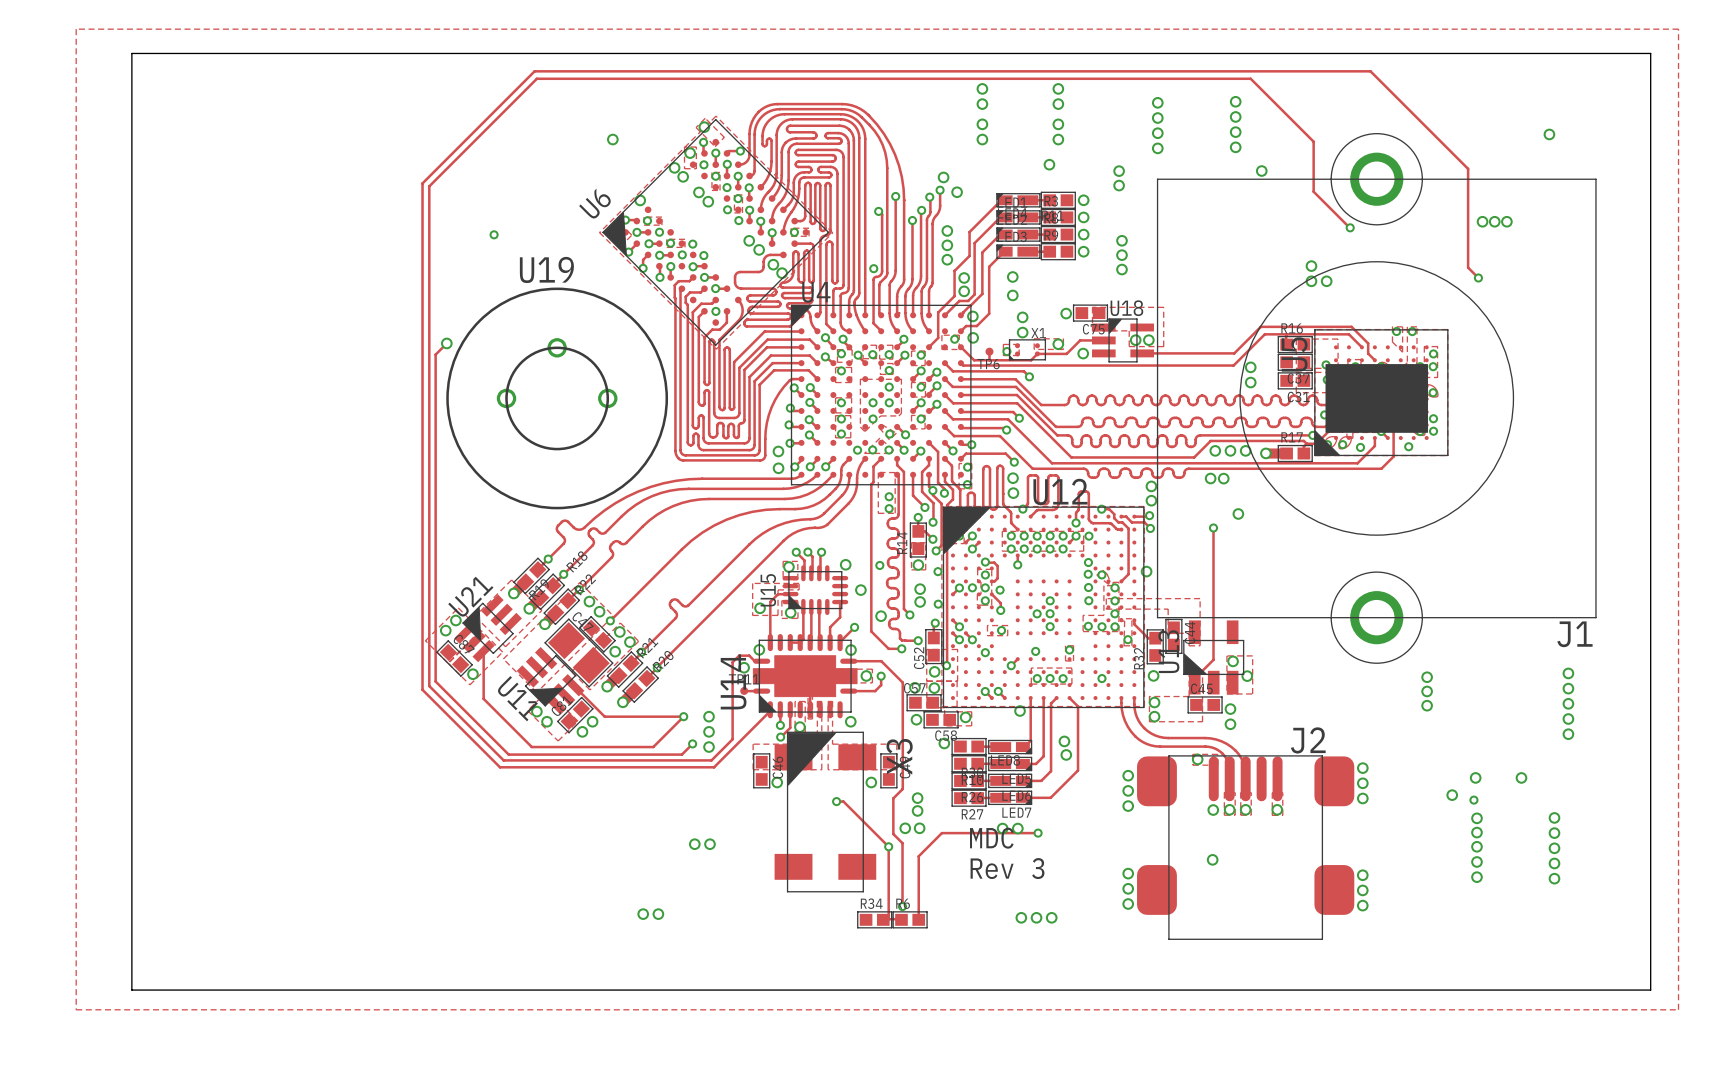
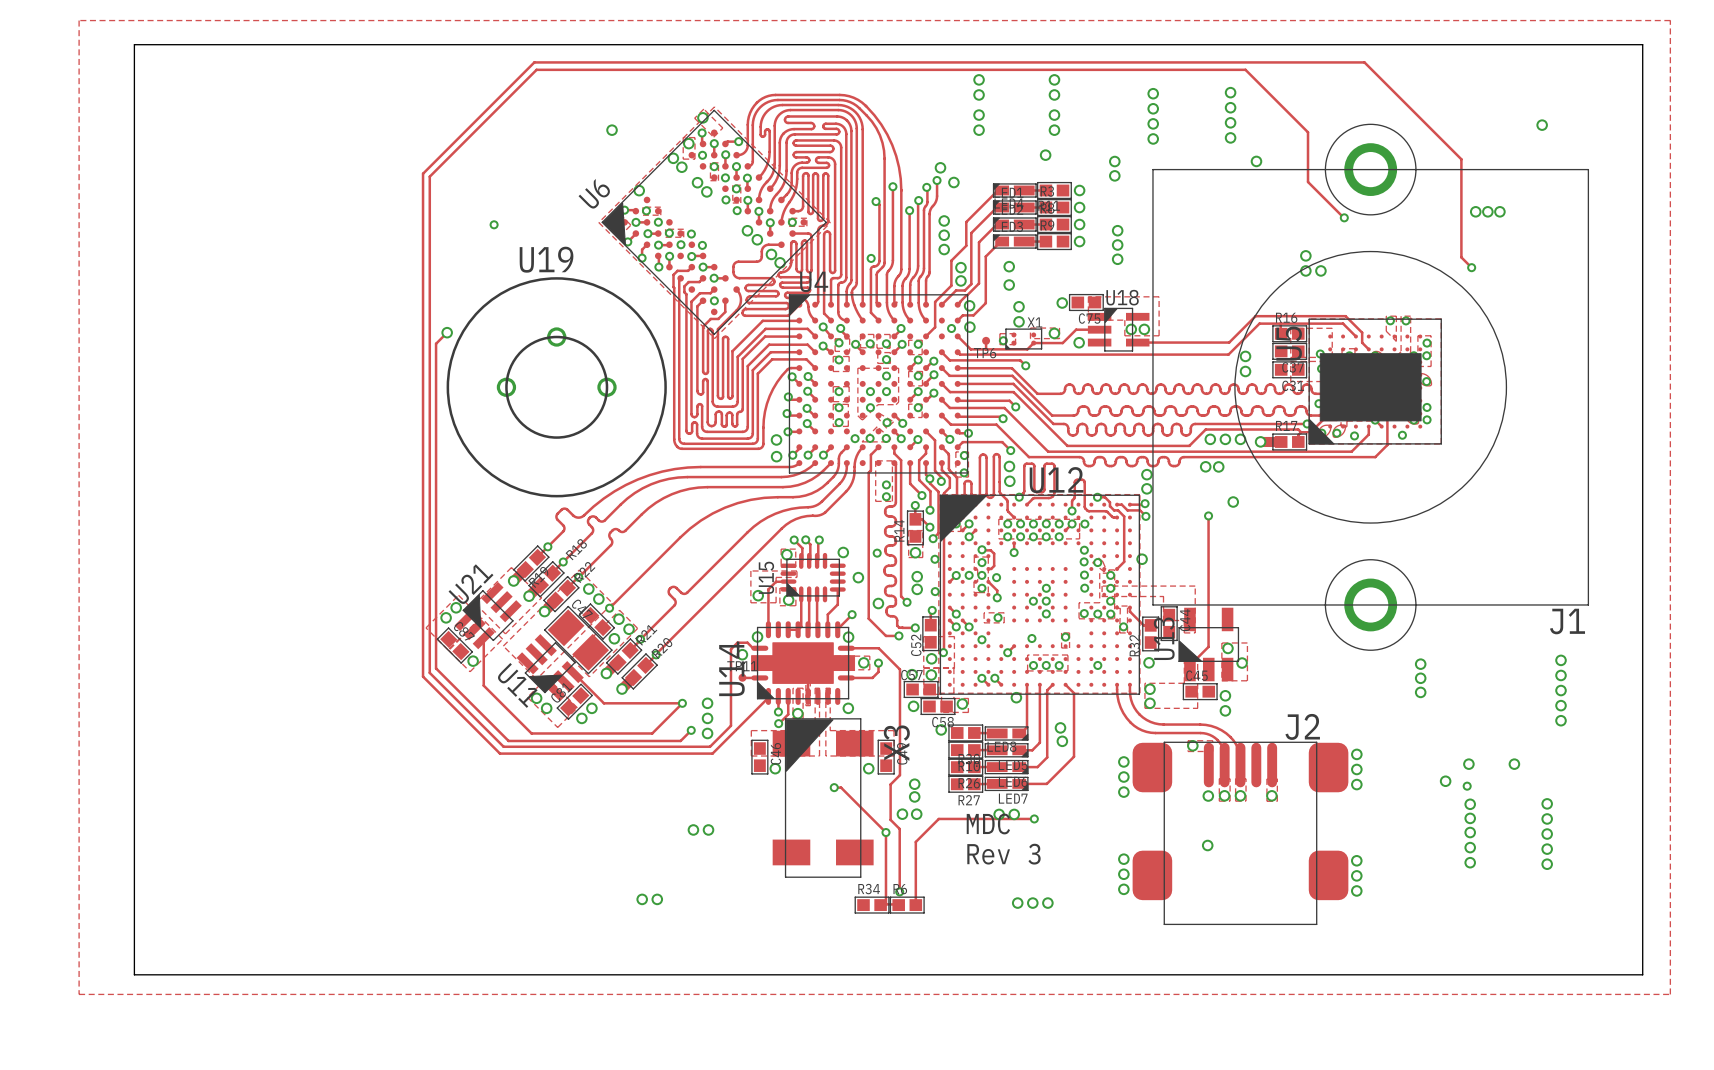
zone outline: (941, 335) (941, 349) (959, 349) (959, 335) (941, 335) -> none

